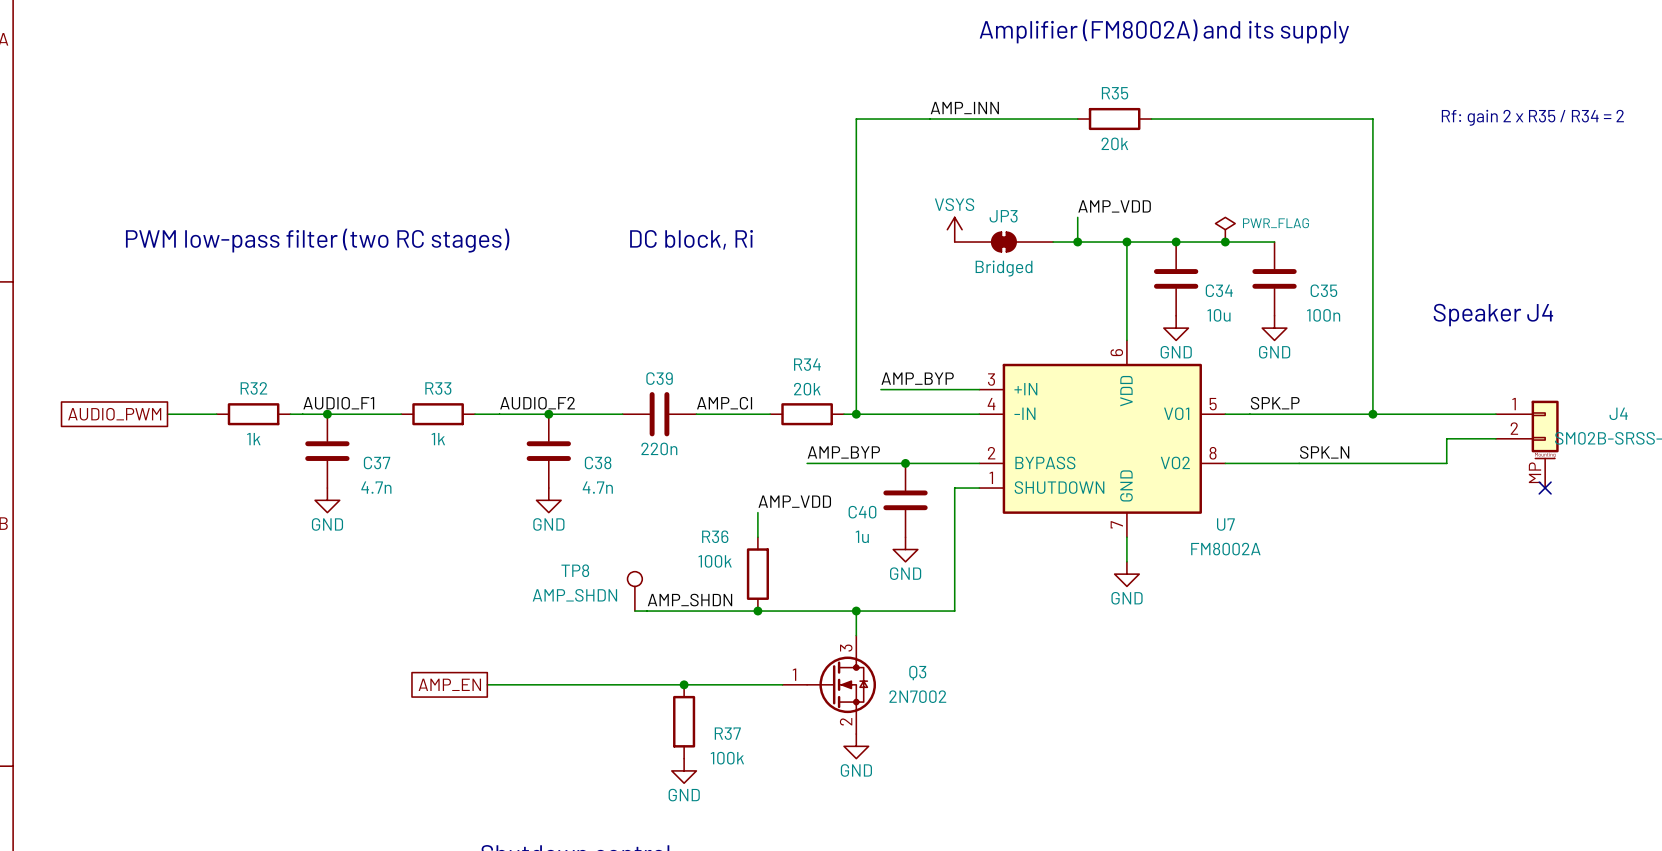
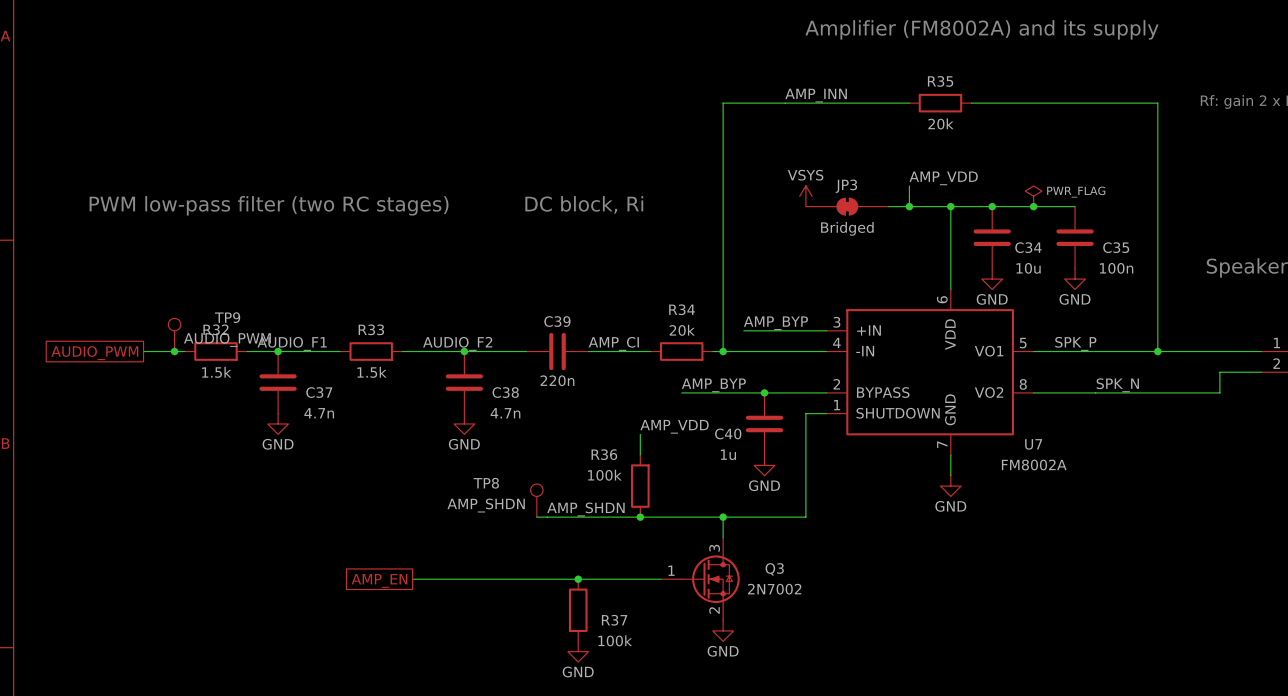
TP9: none -> AUDIO_PWM (174, 334)
junction: none -> (174, 351)
R32 value: 1k (253, 439) -> 1.5k (216, 372)
R33 value: 1k (438, 439) -> 1.5k (371, 372)

